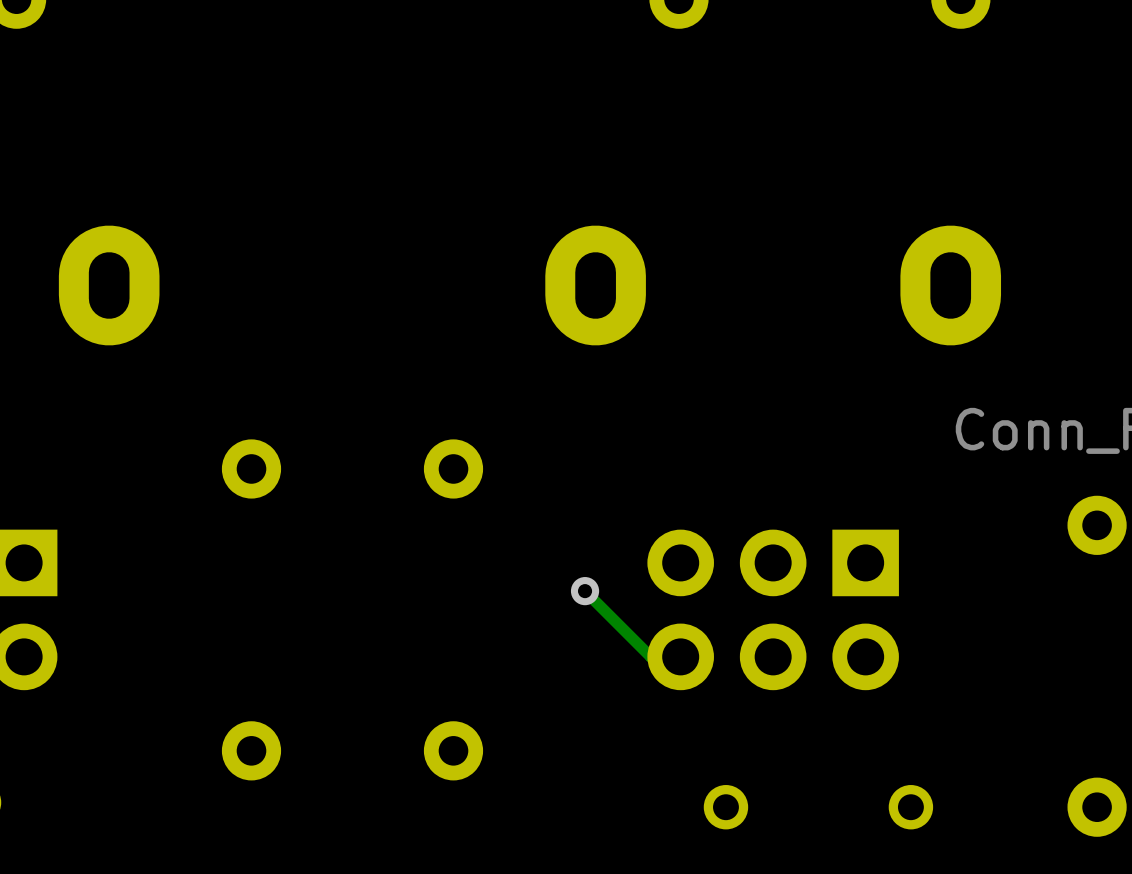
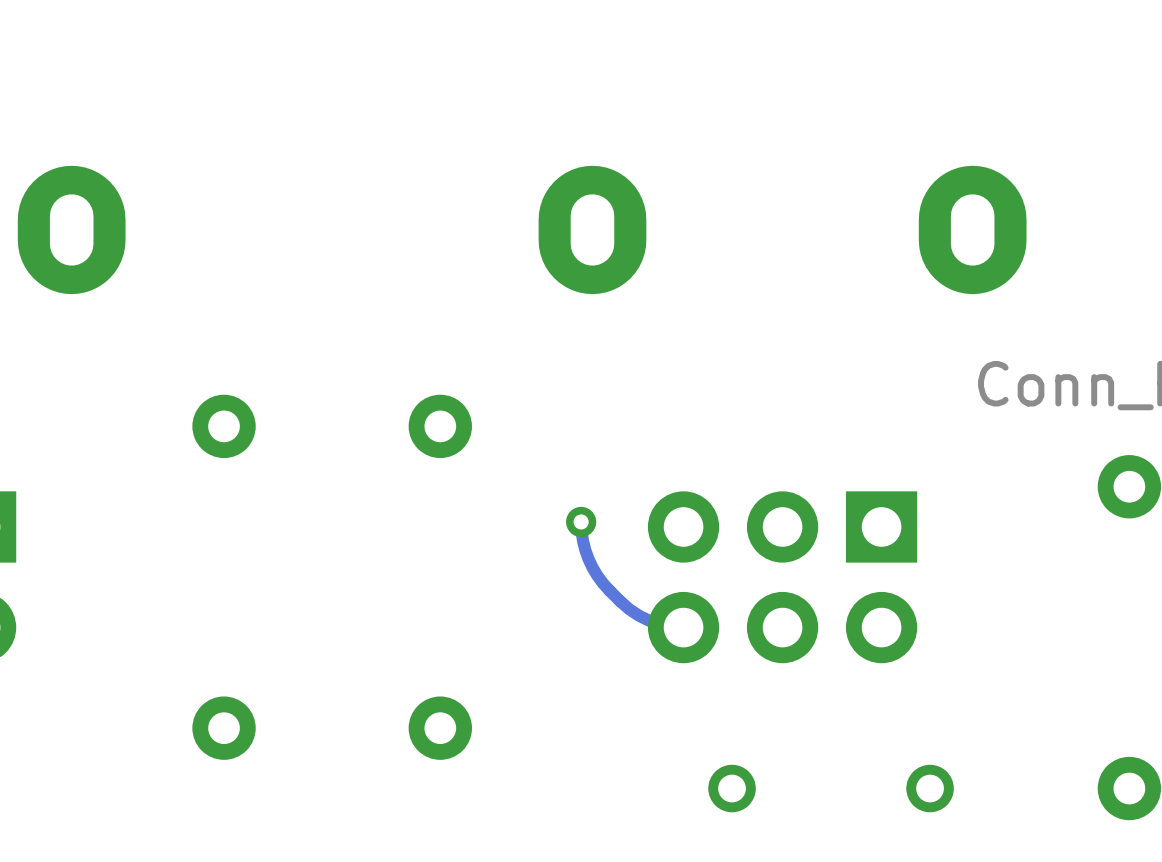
track: (585, 591) (650, 656) (680, 656) -> (581, 521) (583, 540) (588, 559) (597, 575) (609, 590) (638, 615) (660, 624) (683, 627)
via position: (585, 591) -> (581, 521)

